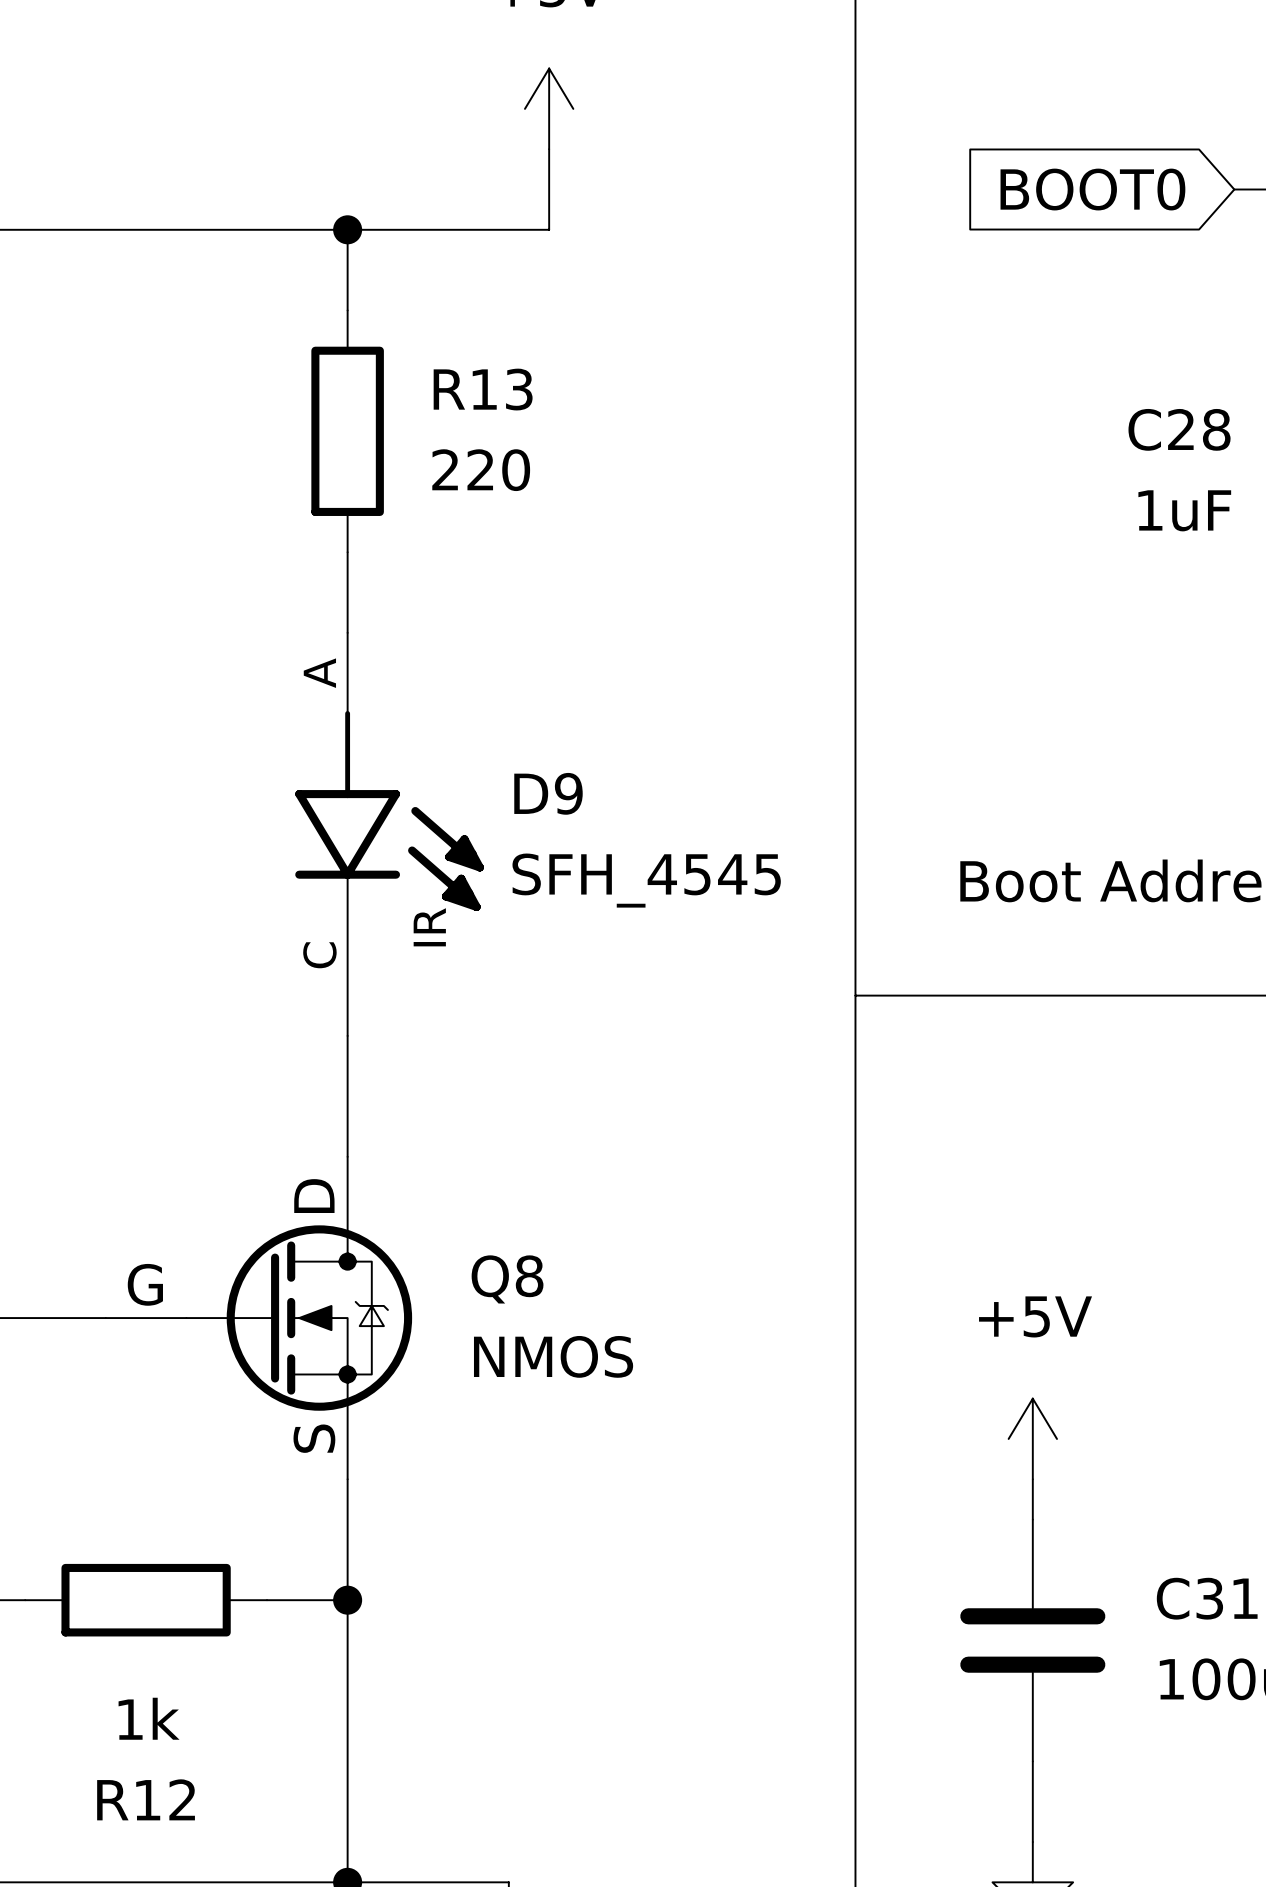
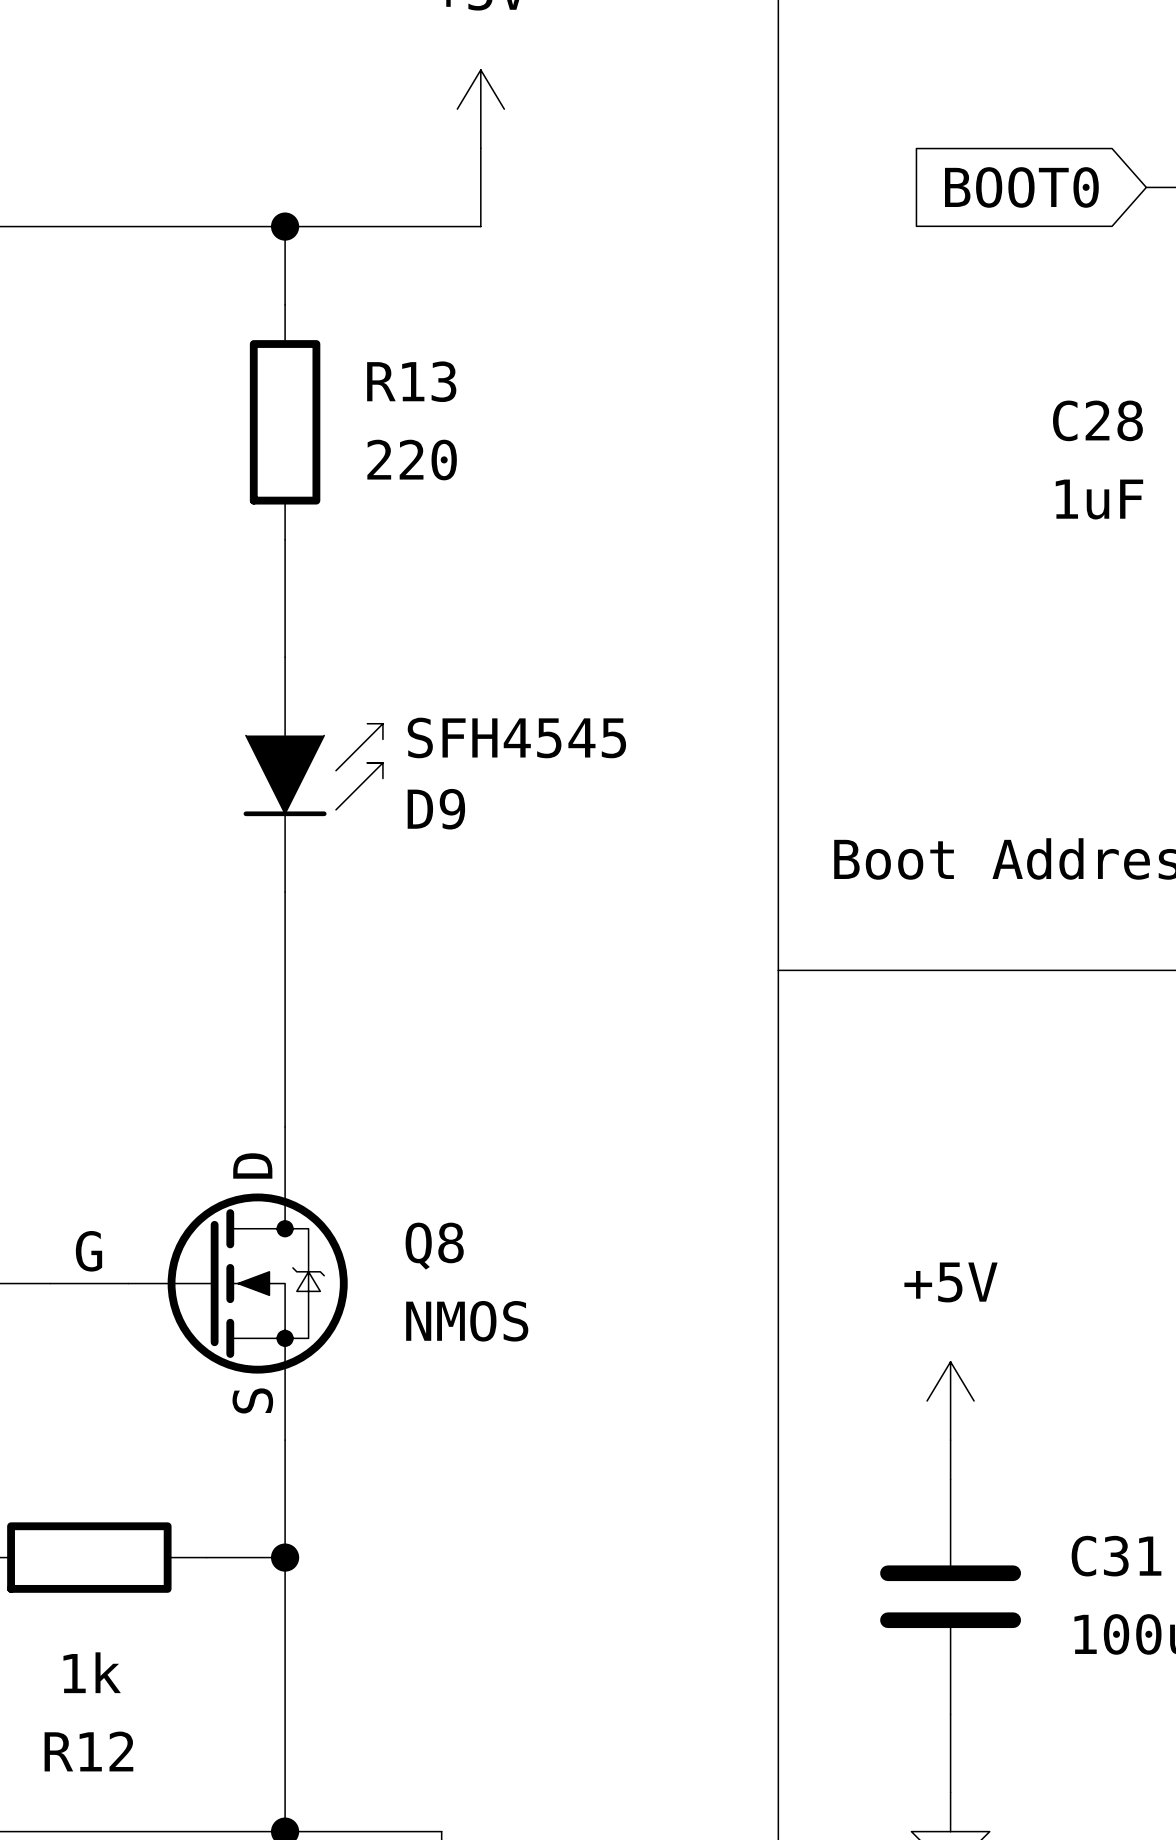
D9 symbol: [295, 632, 484, 1036] -> [243, 657, 383, 893]
D9 name position: D9 (548, 793) -> D9 (436, 809)
D9 value: SFH_4545 (646, 880) -> SFH4545 (516, 737)

